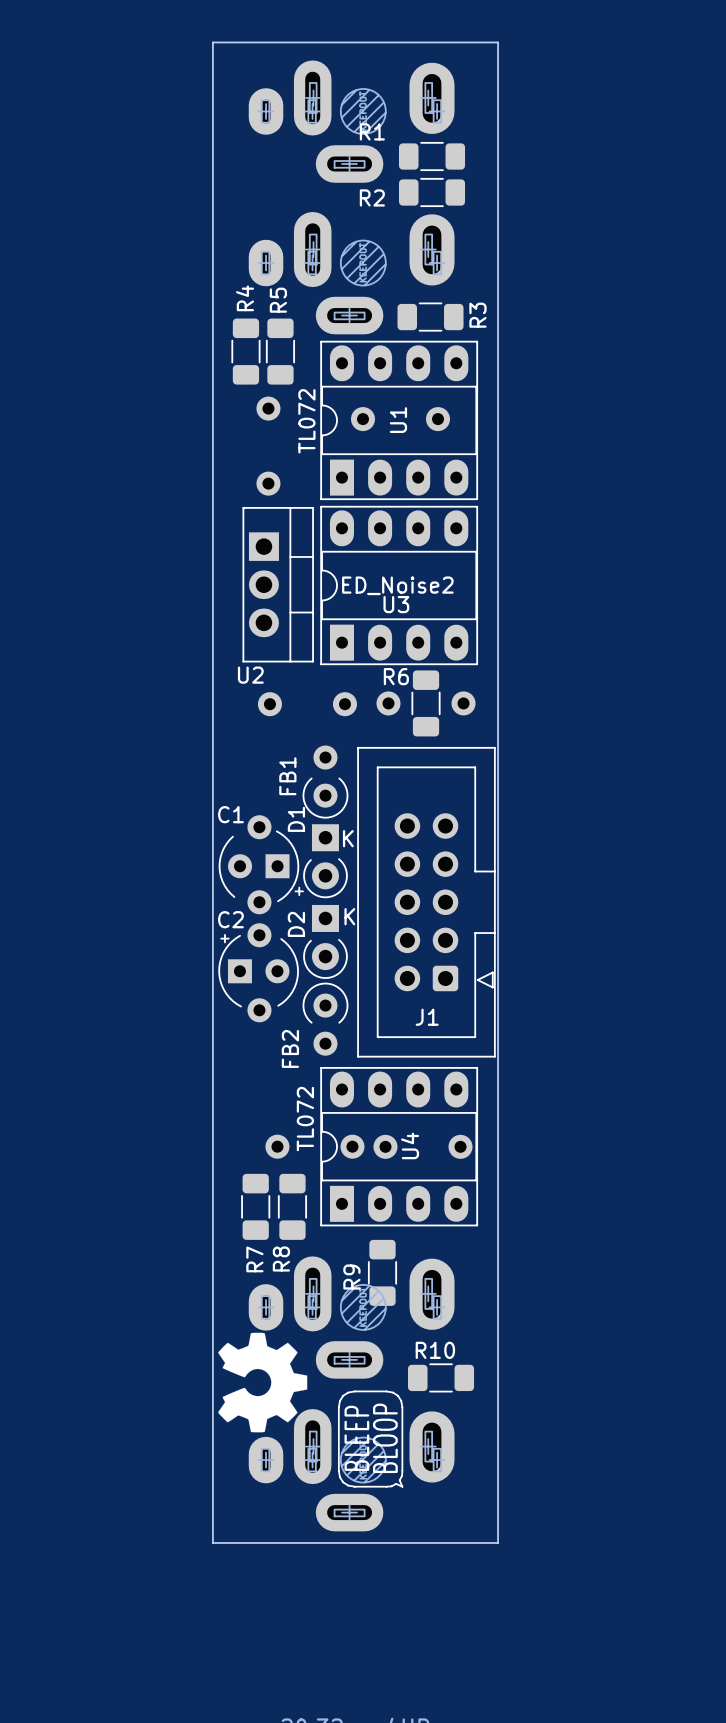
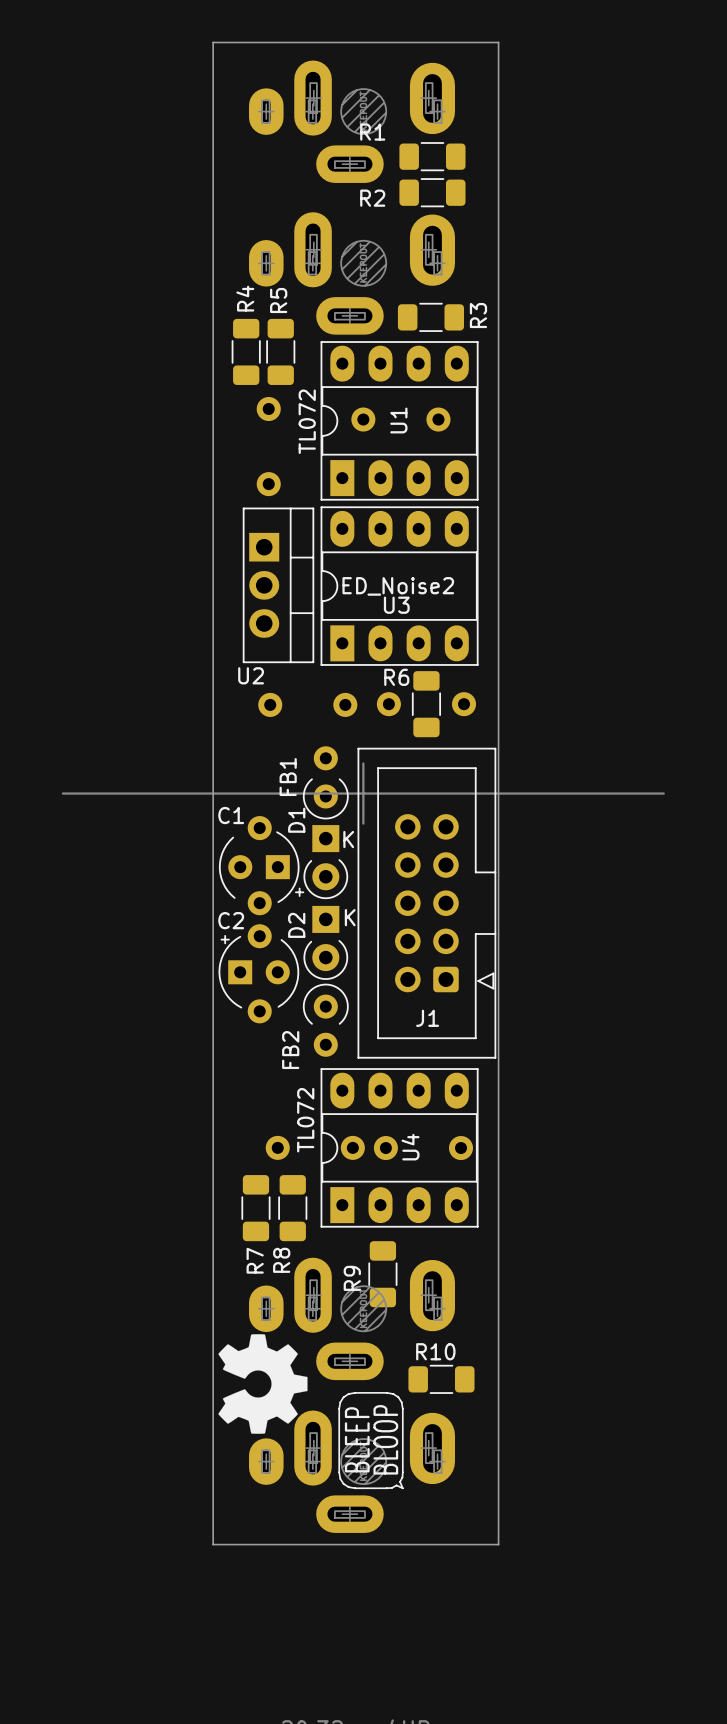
line: none -> (363, 763) (363, 823)
line: none -> (62, 793) (663, 793)

